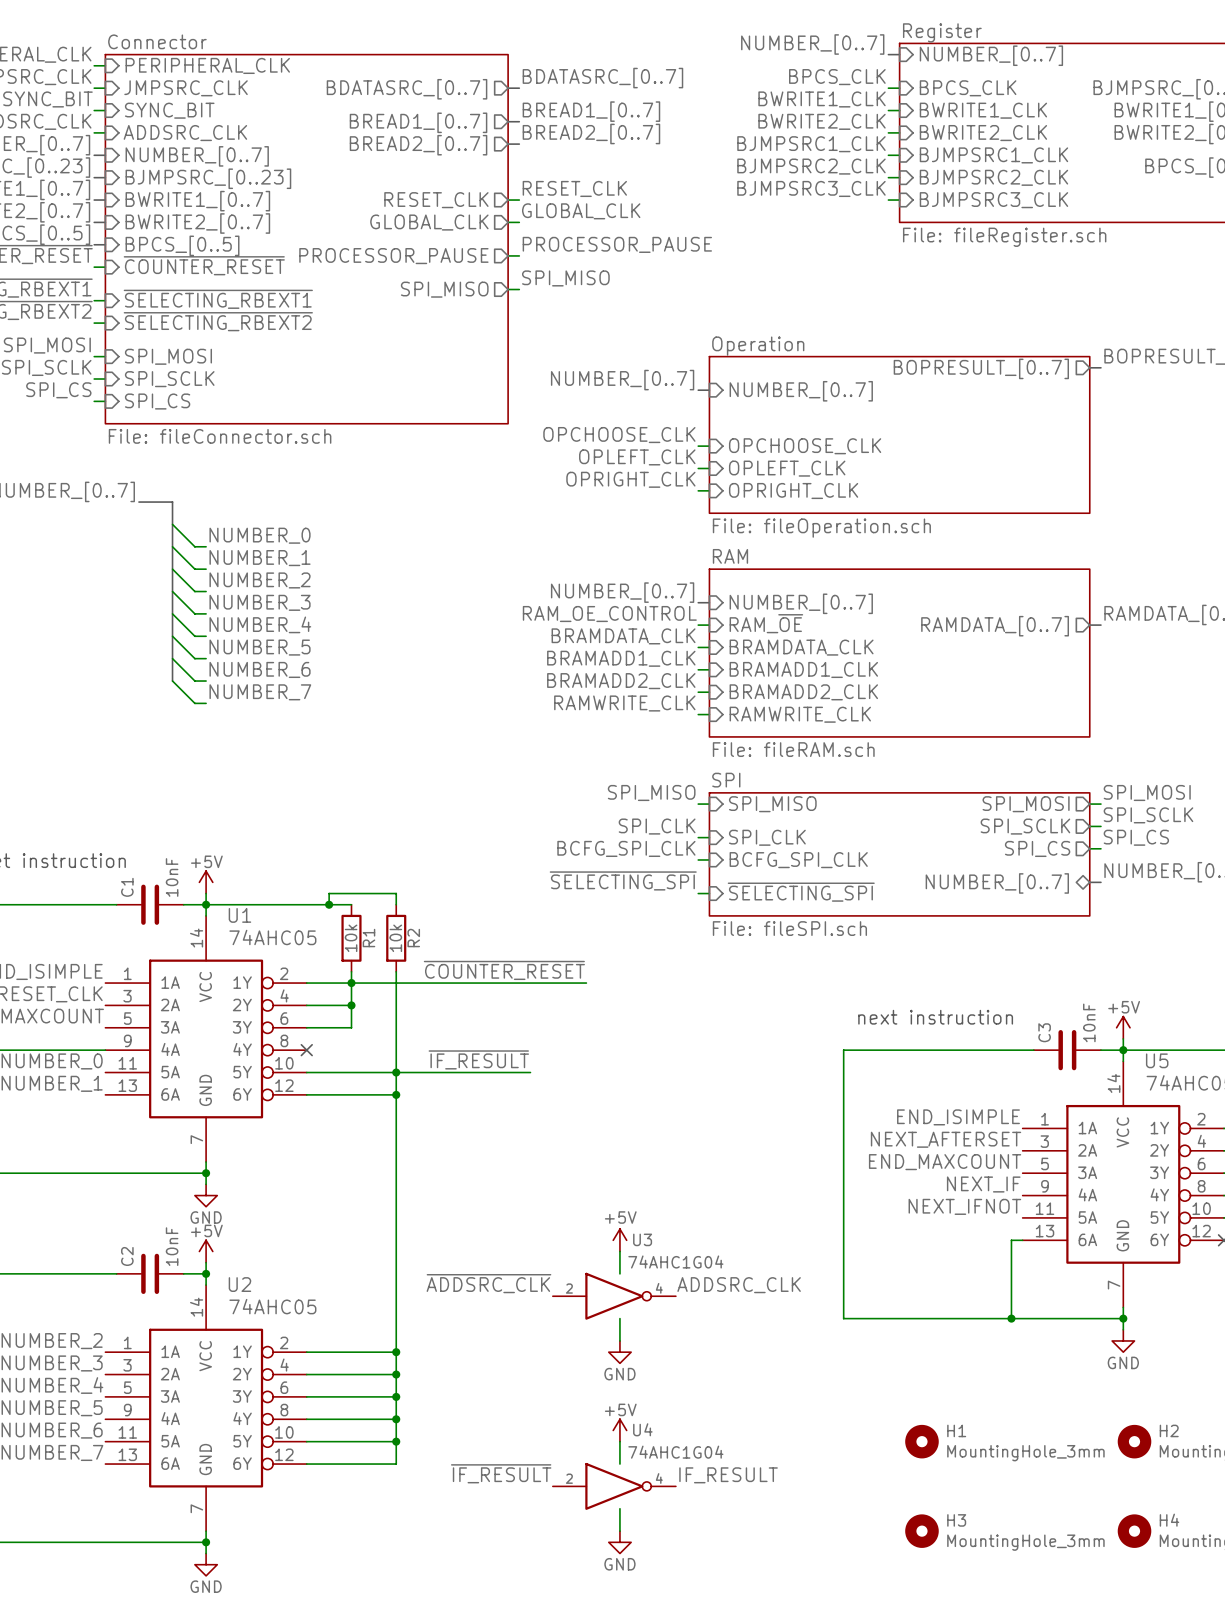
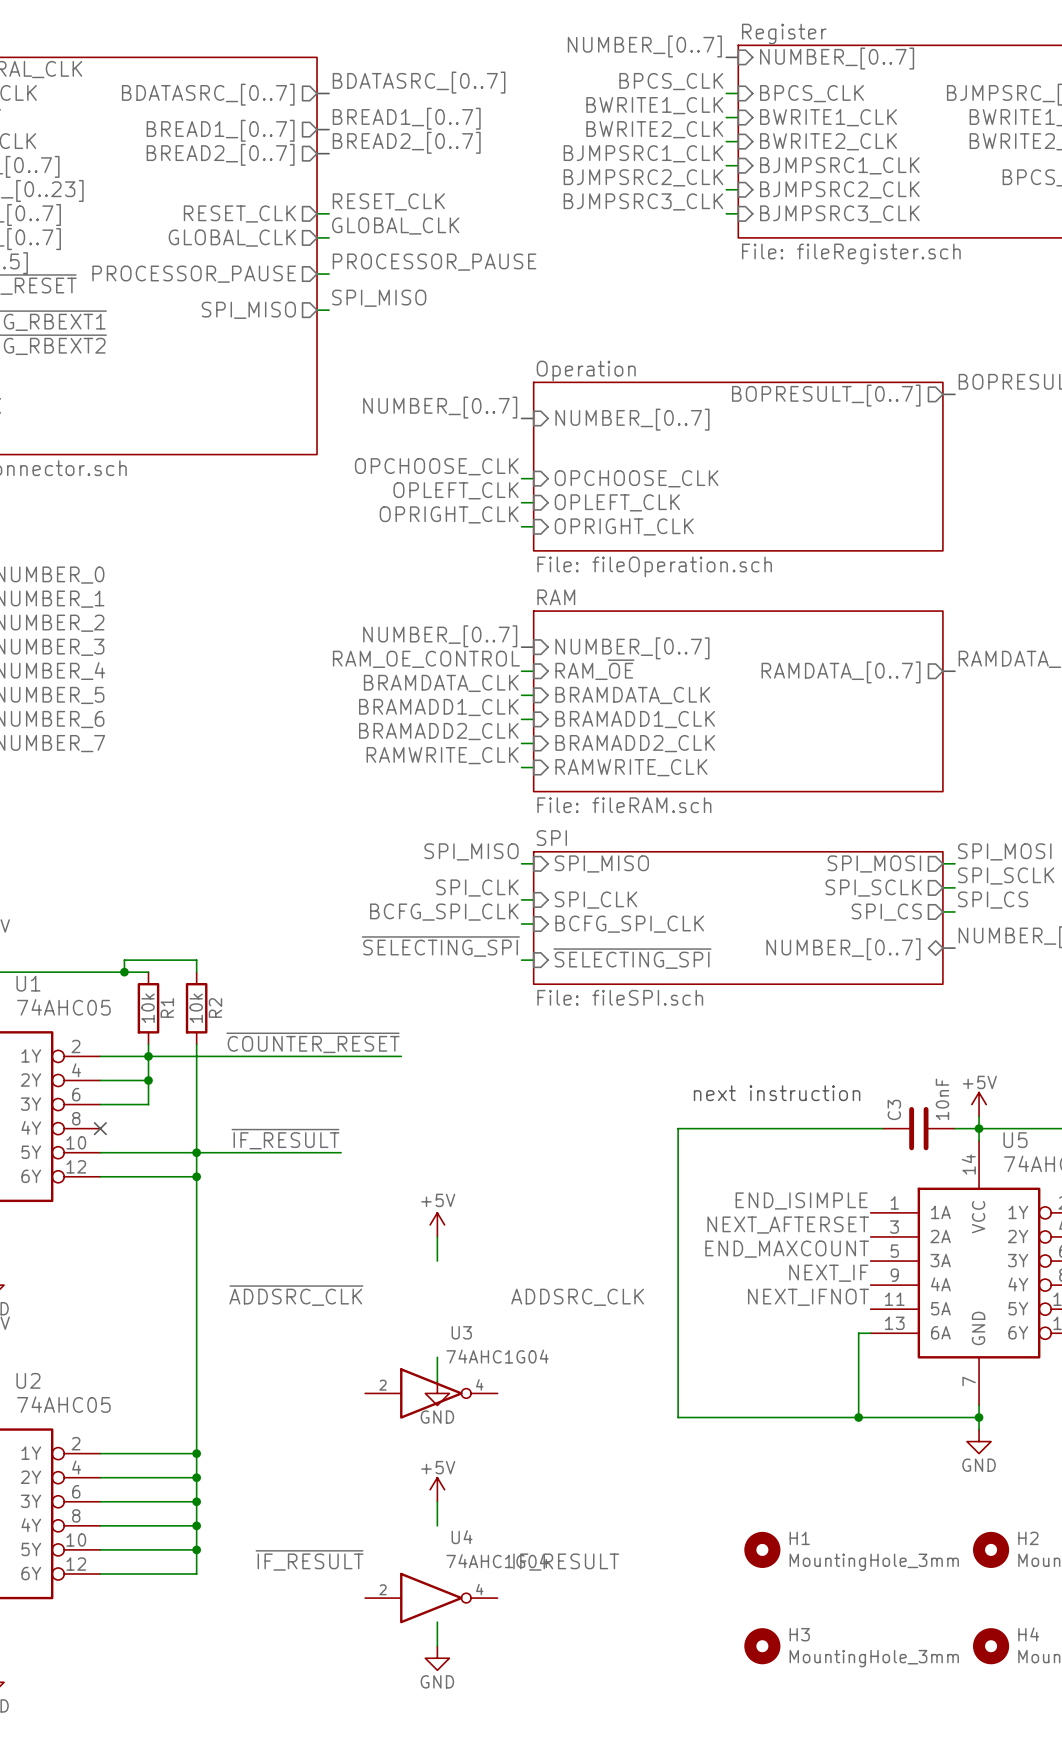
power symbol: none -> +5V (437, 1224)
power symbol: +5V (619, 1240) -> none
wire: (619, 1251) (619, 1262) -> (437, 1369) (437, 1381)
label position: ~{ADDSRC_CLK} (488, 1283) -> ~{ADDSRC_CLK} (296, 1295)
label position: ADDSRC_CLK (739, 1285) -> ADDSRC_CLK (577, 1297)
wire: (619, 1318) (619, 1340) -> (437, 1236) (437, 1261)
power symbol position: GND (619, 1352) -> GND (437, 1393)
power symbol position: +5V (619, 1430) -> +5V (437, 1489)
wire: (619, 1441) (619, 1464) -> (437, 1501) (437, 1525)
label position: ~{IF_RESULT} (501, 1473) -> ~{IF_RESULT} (309, 1560)
label position: IF_RESULT (728, 1475) -> IF_RESULT (566, 1562)

